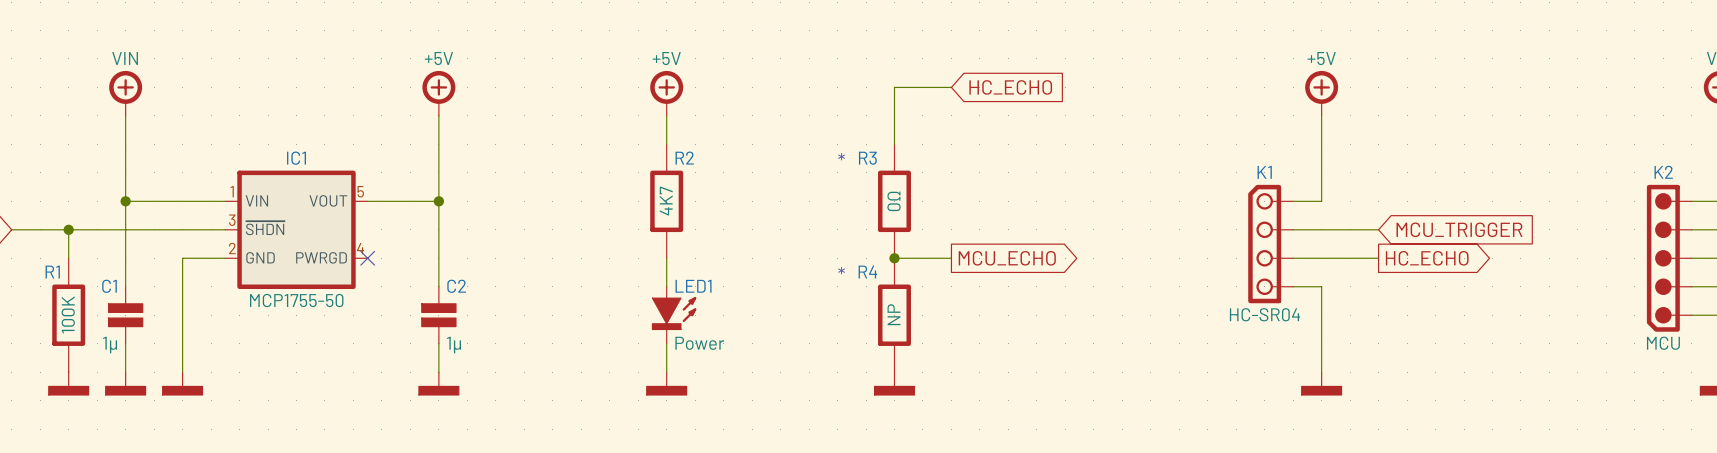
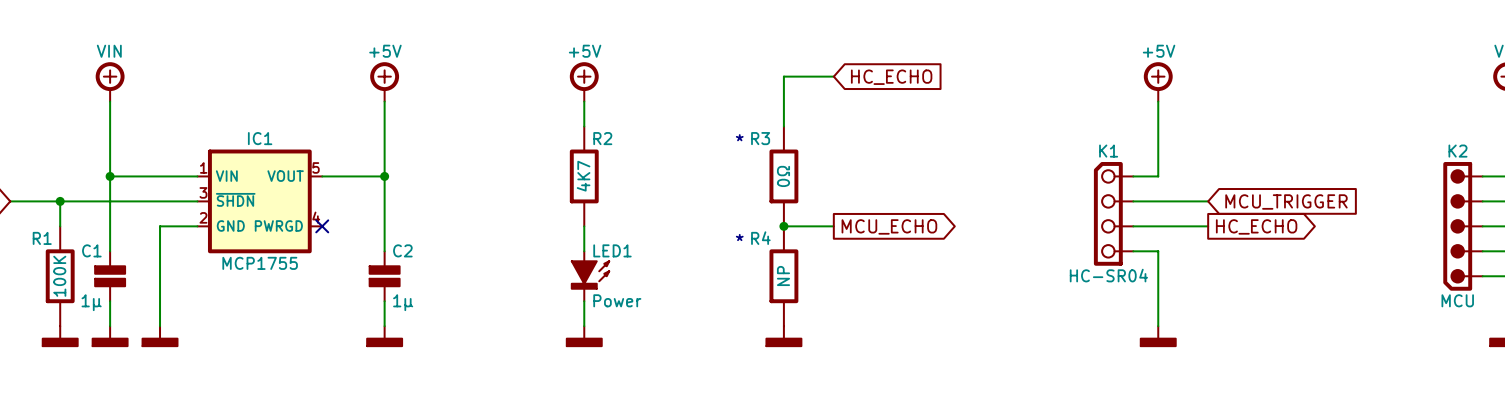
IC1 text: MCP1755-50 (296, 300) -> none
IC1 value: none -> MCP1755 (260, 263)

